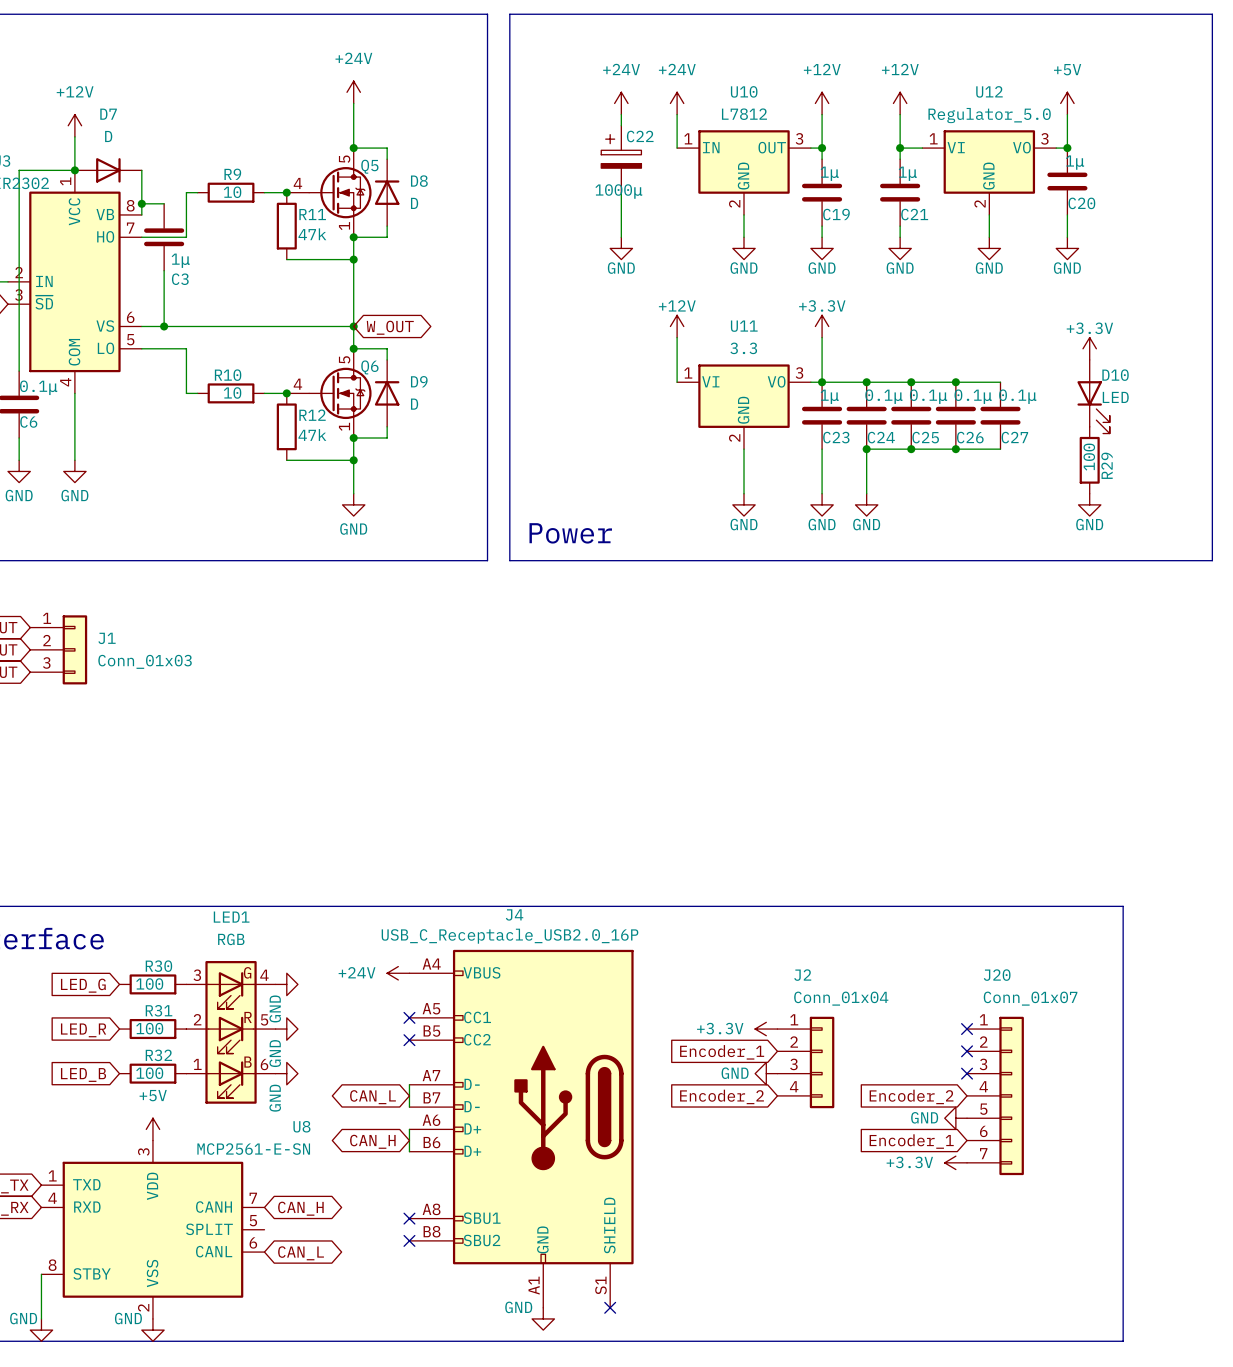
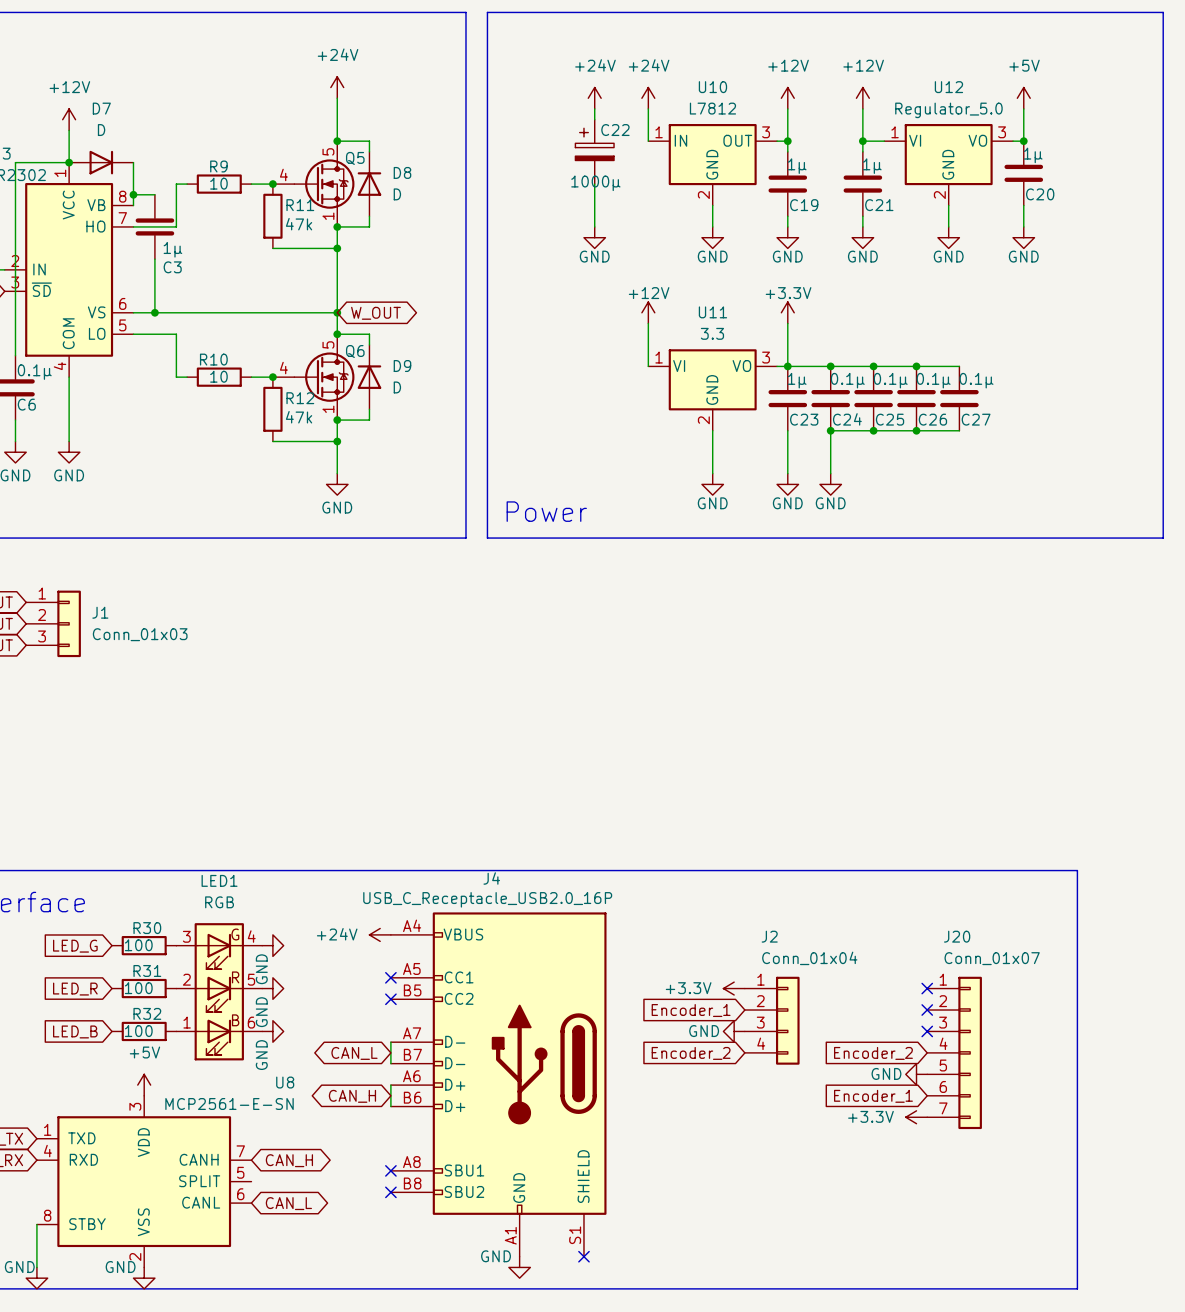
power symbol: +3.3V (1089, 348) -> none
D10: LED (1093, 396) -> none
R29: 100 (1089, 460) -> none
power symbol: GND (1089, 504) -> none

